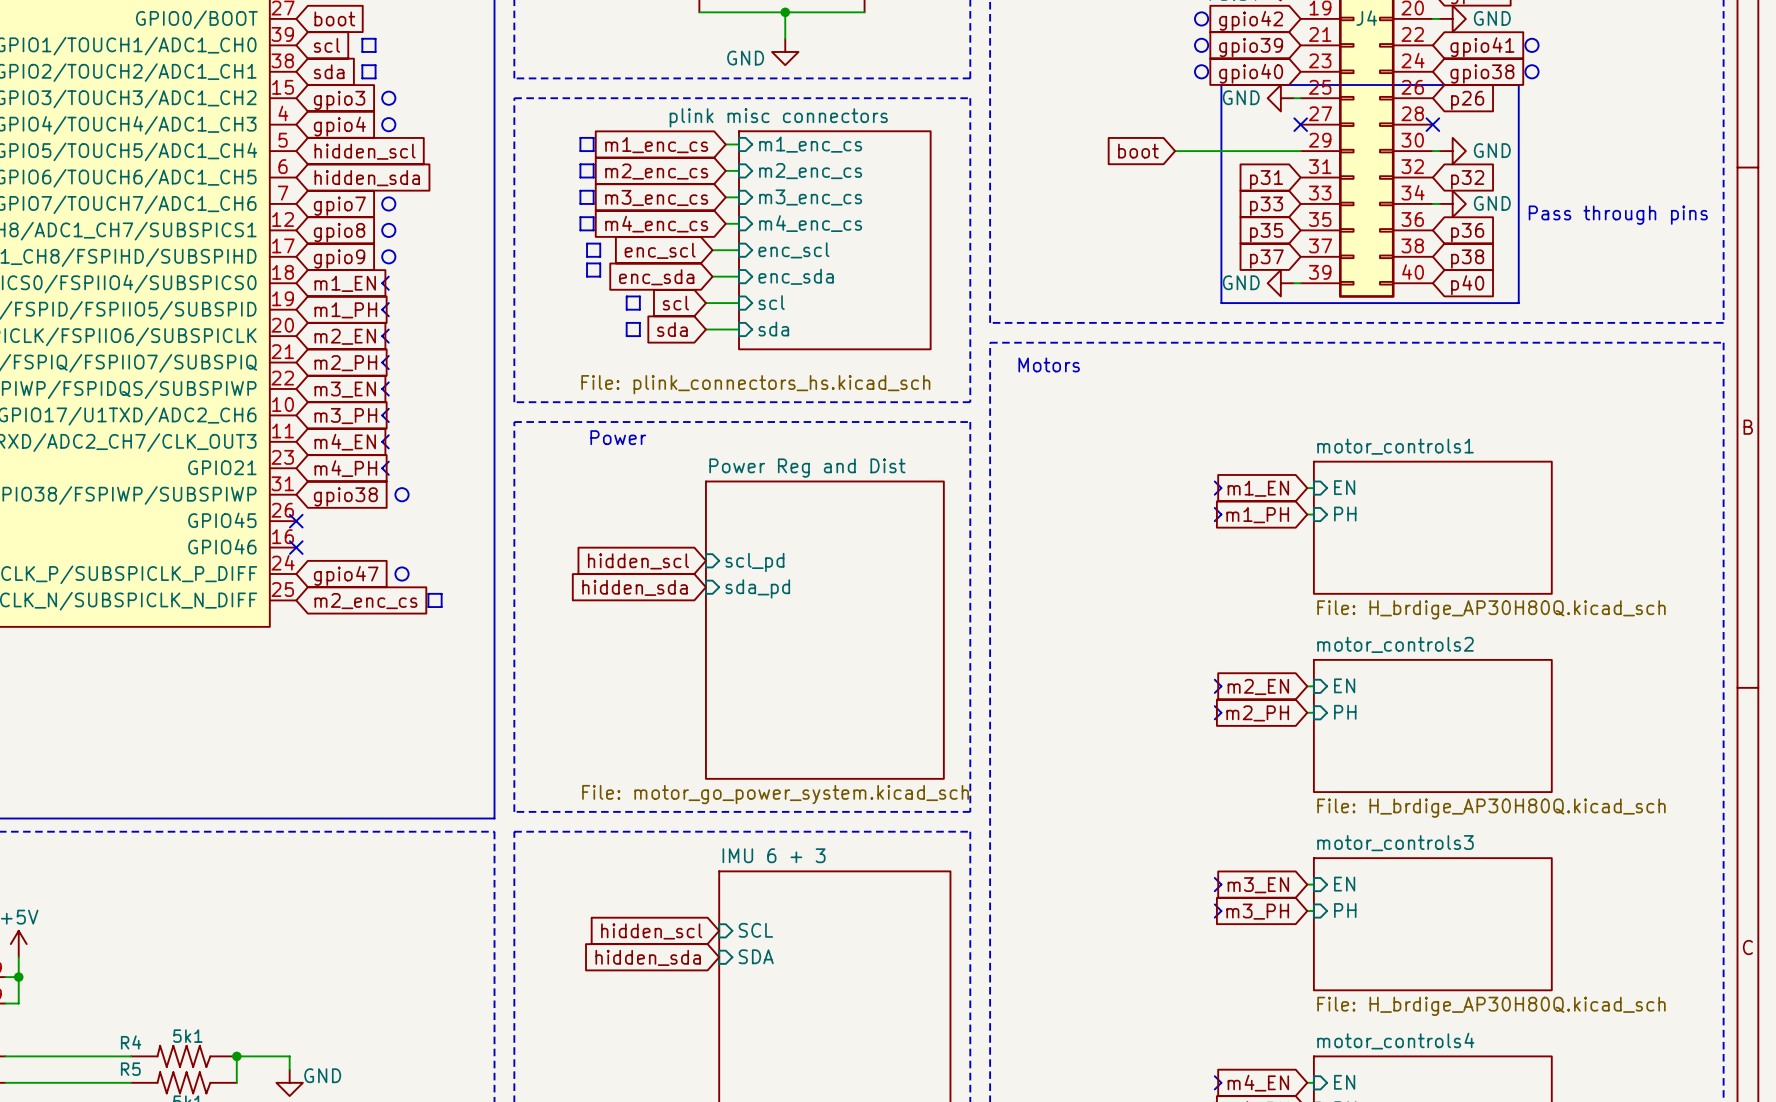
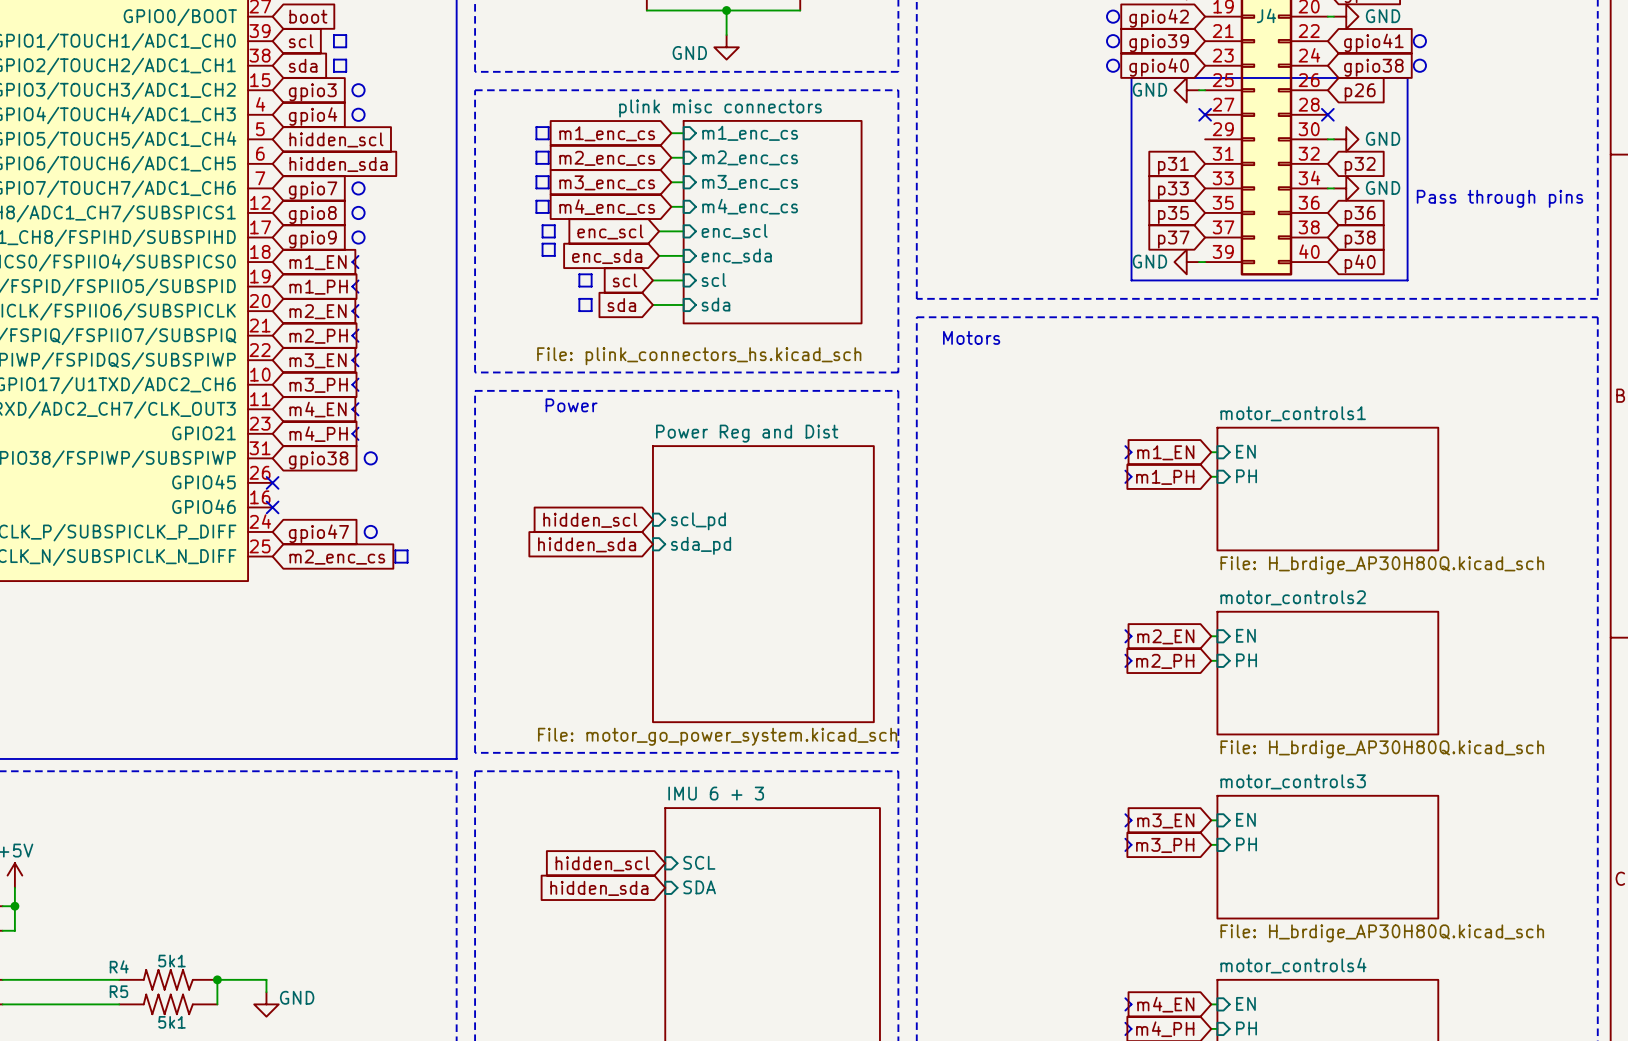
global label: boot (1138, 151) -> none
wire: (1175, 151) (1300, 151) -> none

